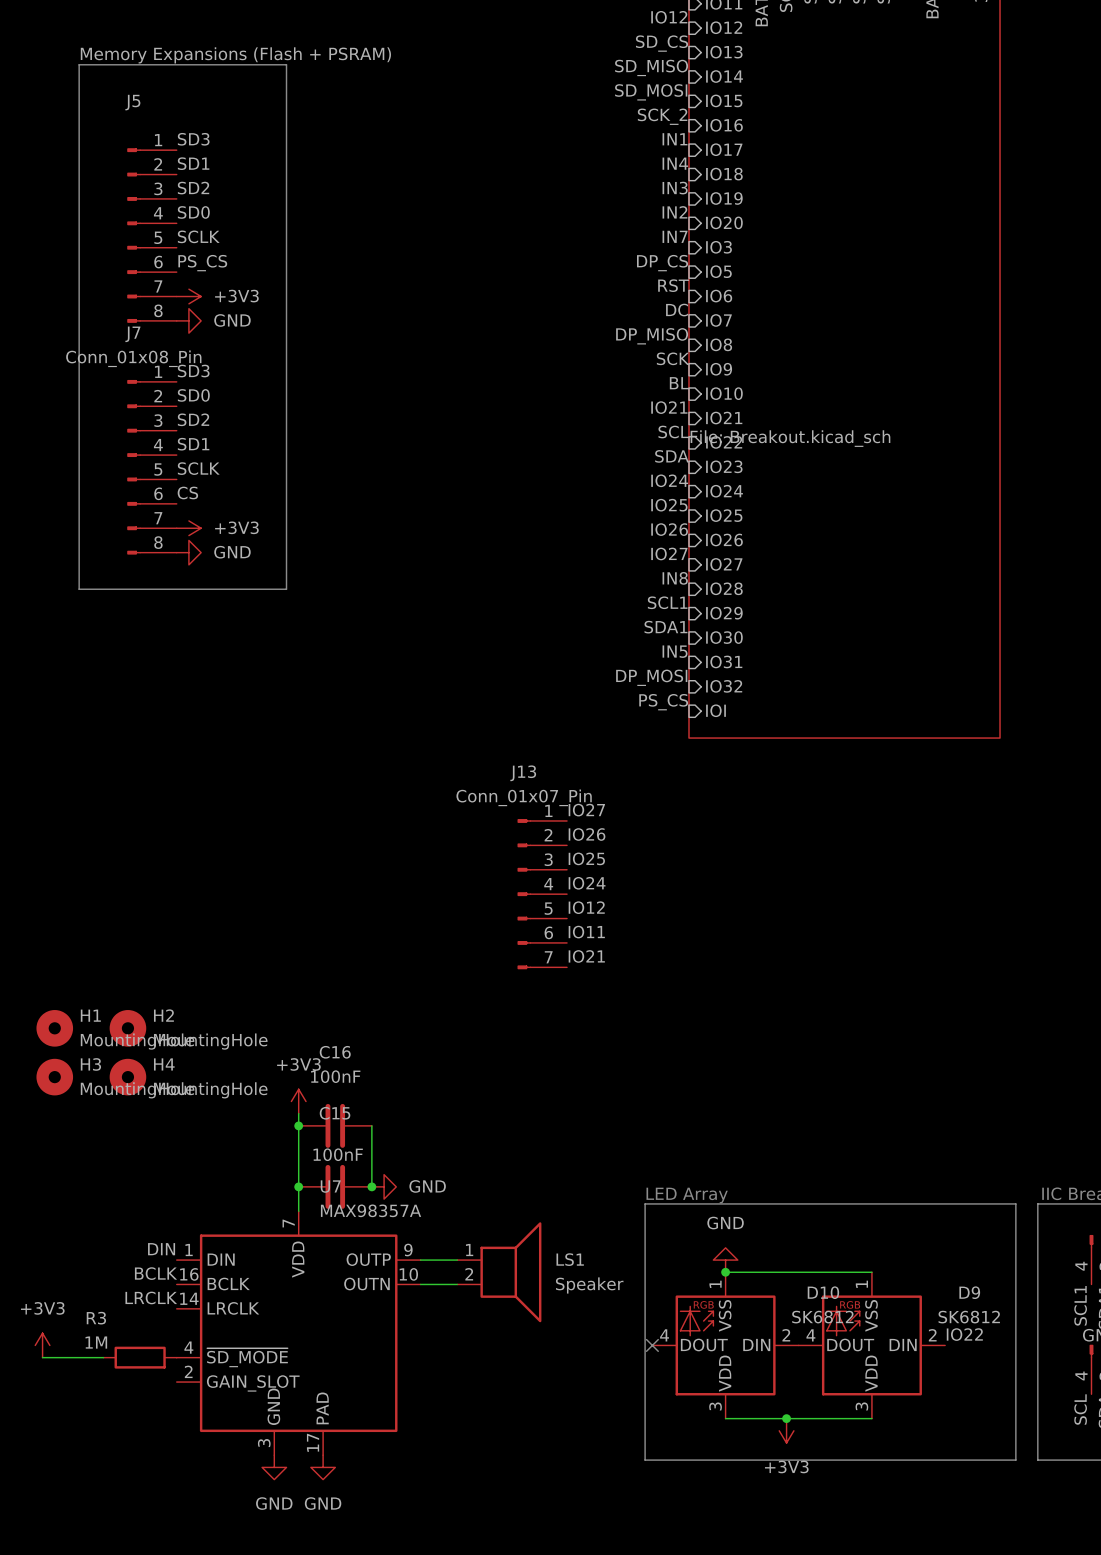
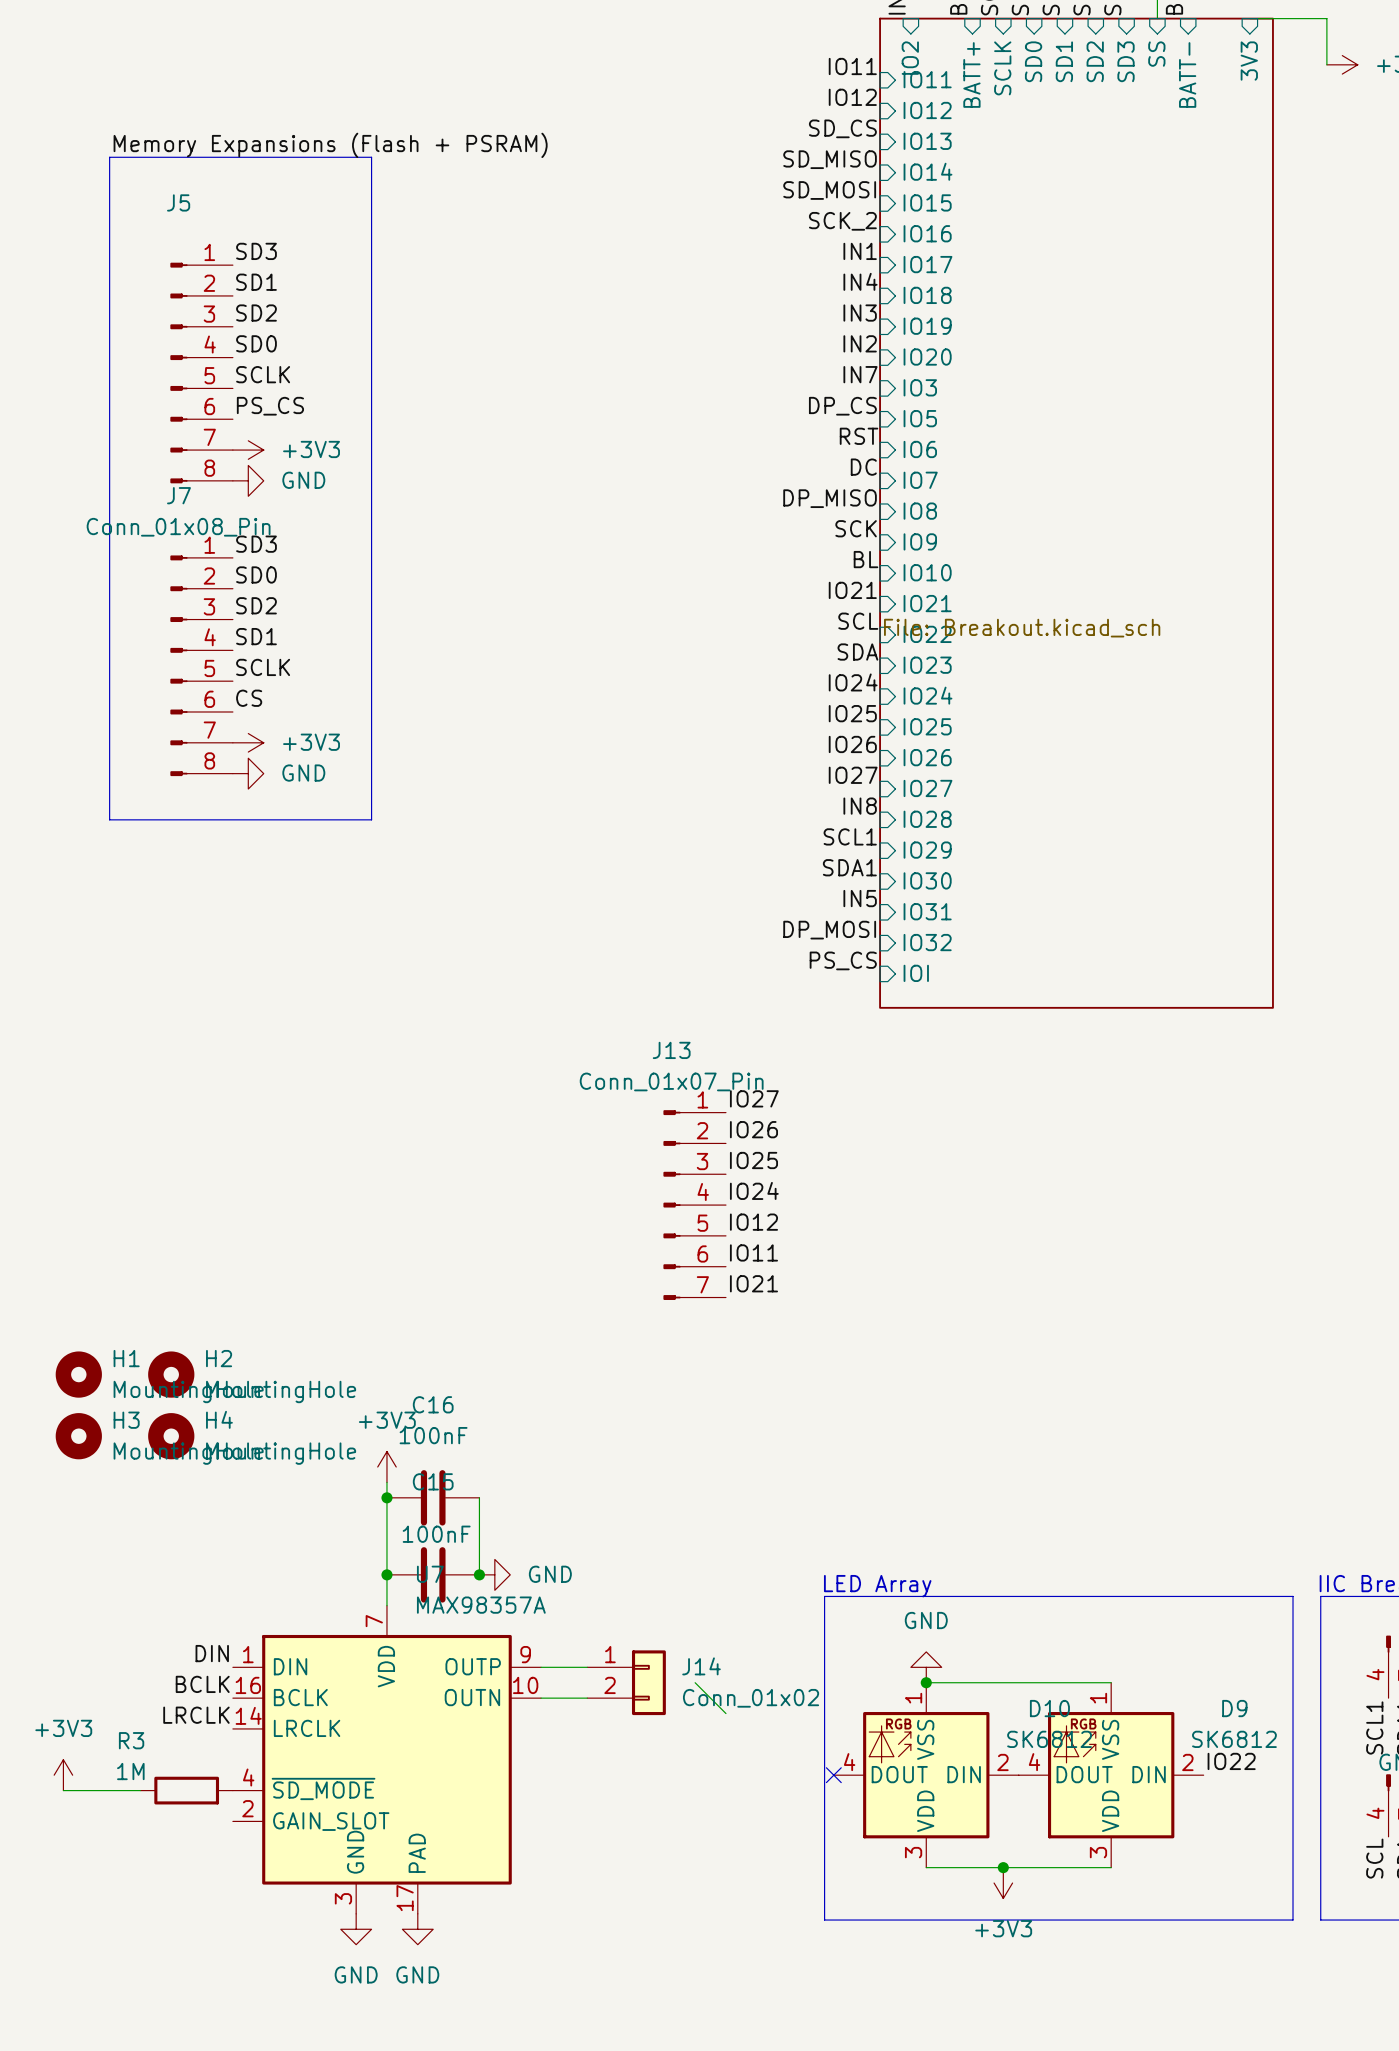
J14: none -> Conn_01x02 (626, 1682)
LS1: Speaker (499, 1272) -> none
wire: none -> (695, 1682) (725, 1713)

